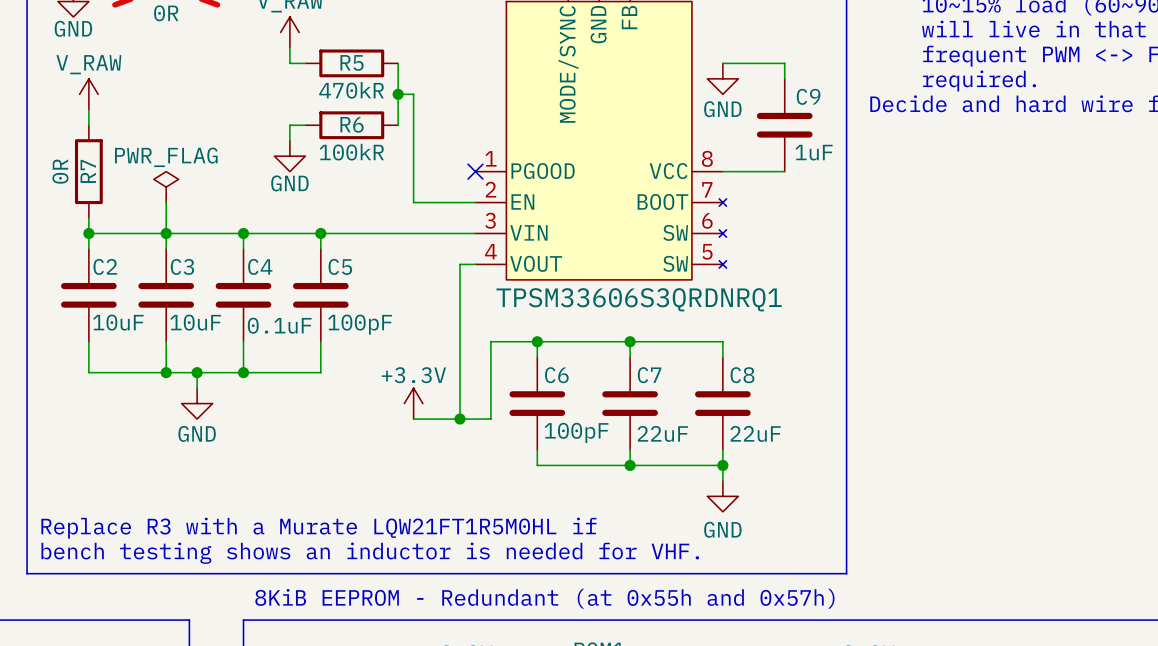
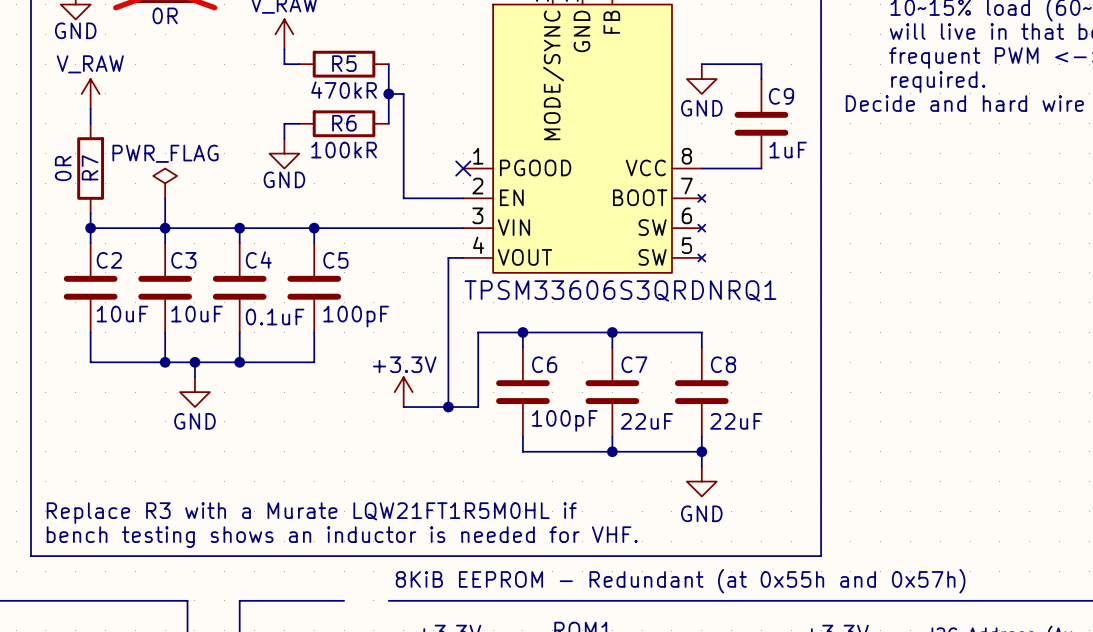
text position: 8KiB EEPROM - Redundant (at 0x55h and 0x57h) (544, 598) -> 8KiB EEPROM - Redundant (at 0x55h and 0x57h) (680, 581)
line: (351, 620) (398, 620) -> none

